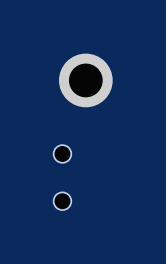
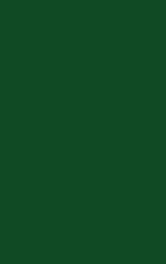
part: (85, 80) -> none
part: (62, 153) -> none
part: (62, 201) -> none

